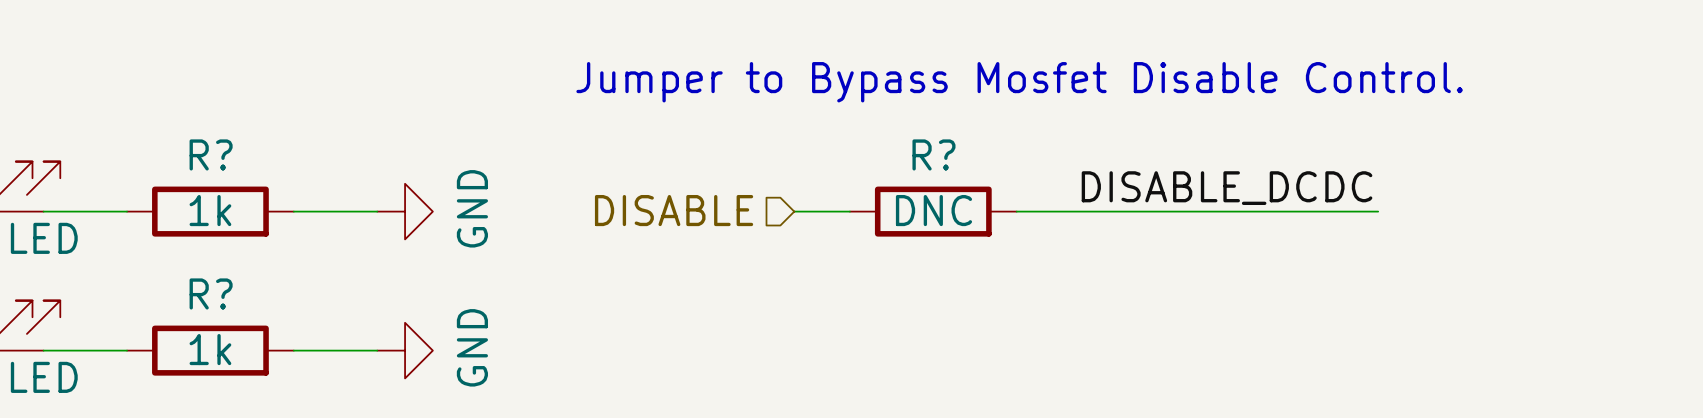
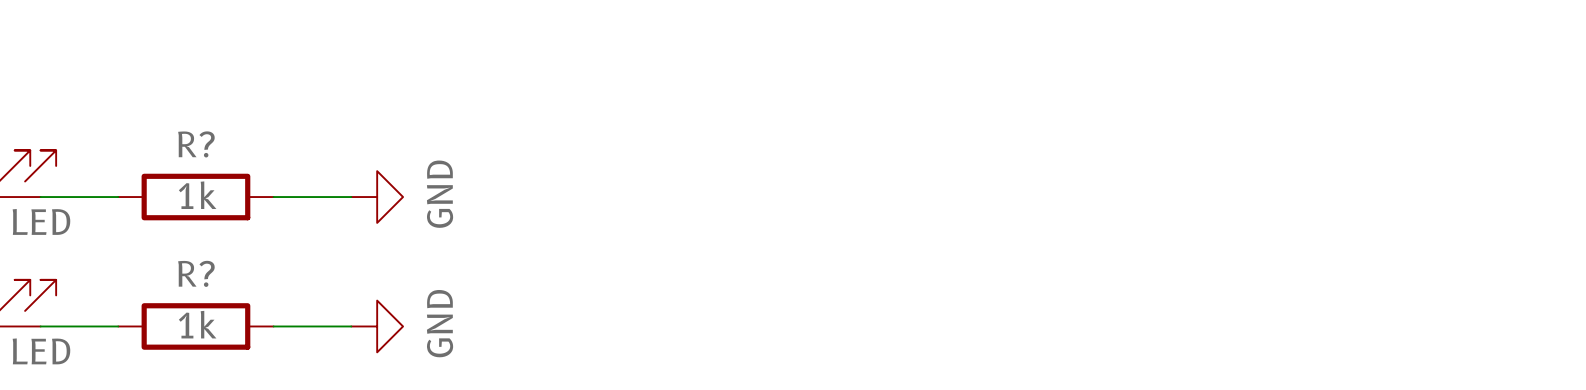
text: Jumper to Bypass Mosfet Disable Control. (1019, 82) -> none
label: DISABLE_DCDC (1227, 188) -> none
hierarchical label: DISABLE (674, 210) -> none
wire: (794, 211) (849, 211) -> none
R?: DNC (933, 211) -> none
wire: (1016, 211) (1378, 211) -> none

